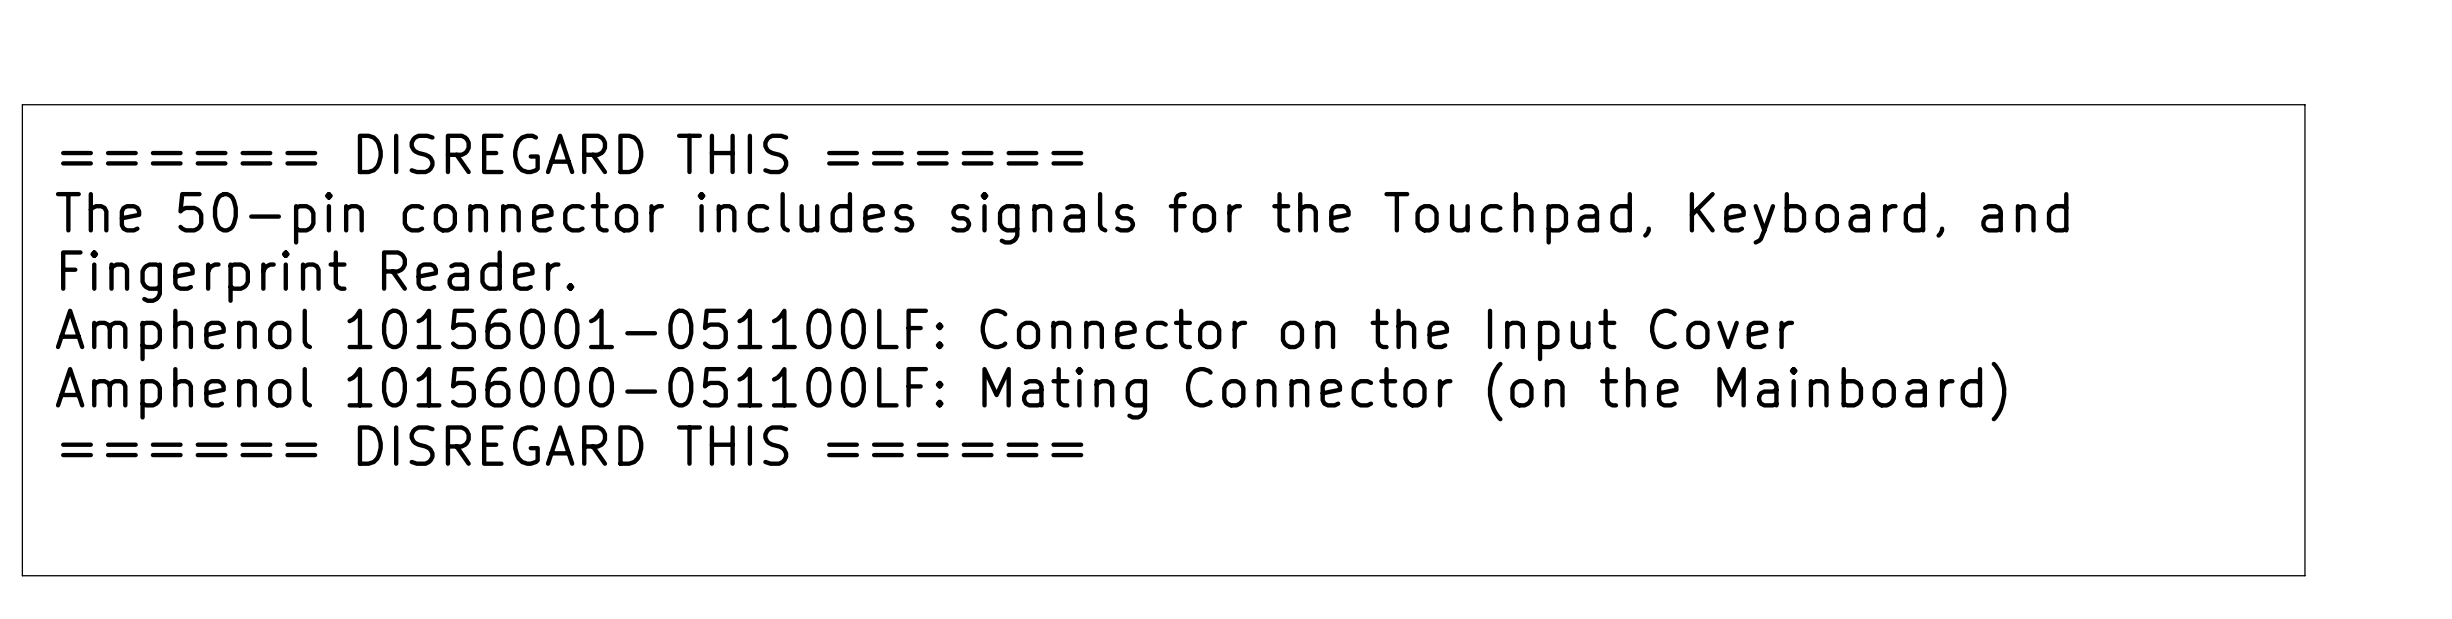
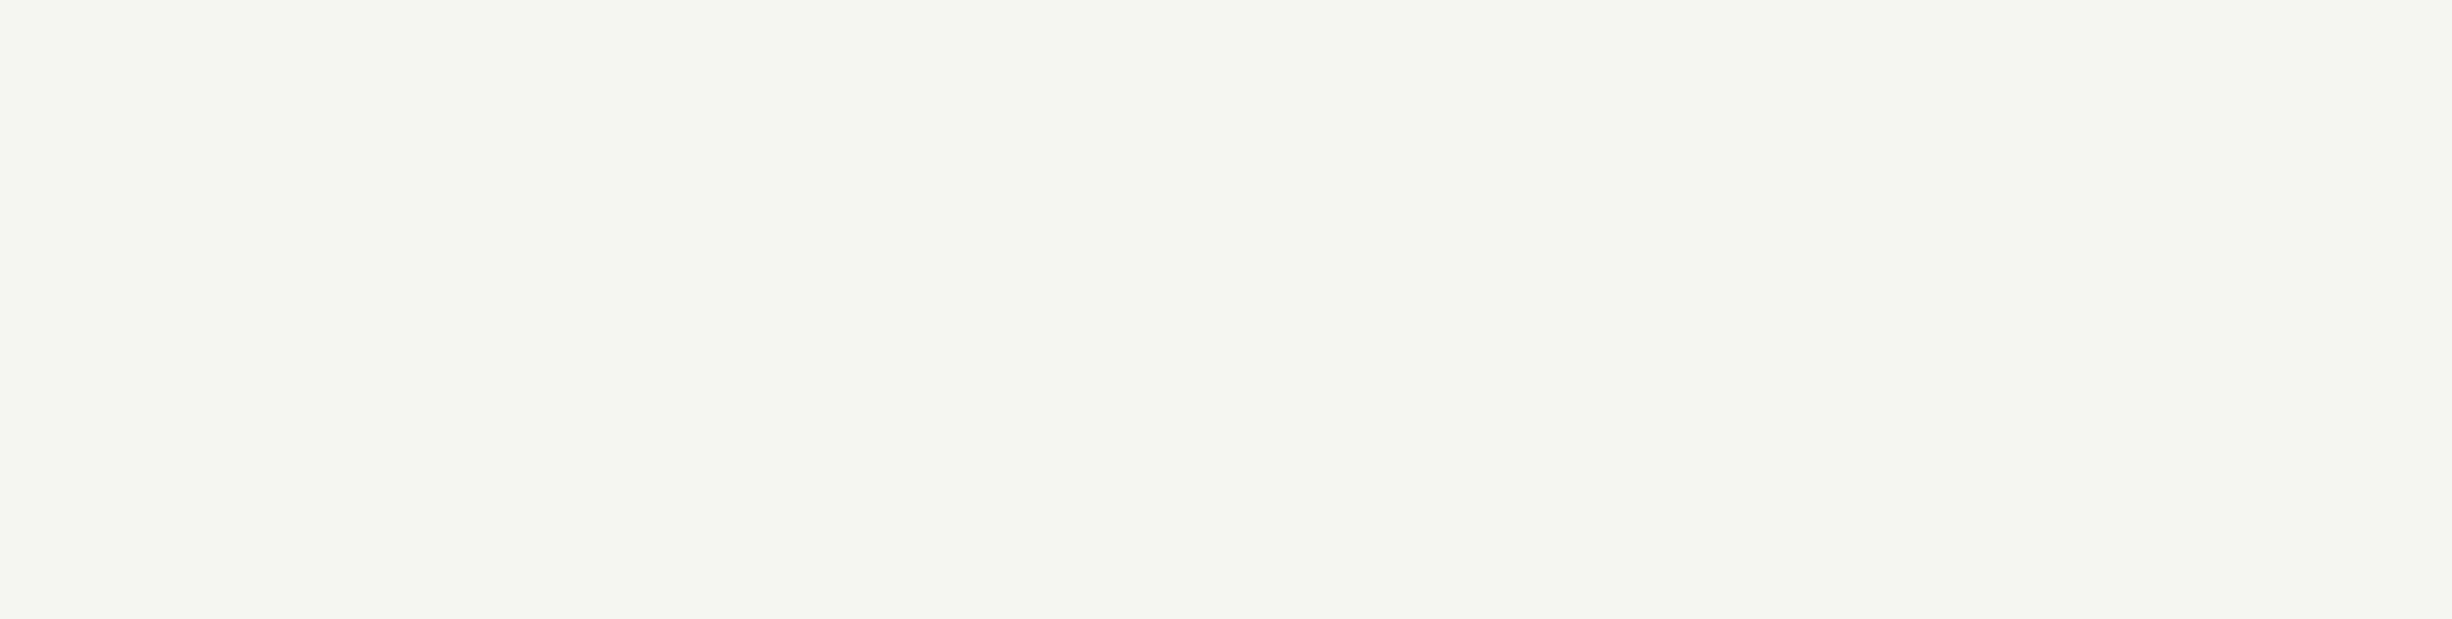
line: (22, 104) (2304, 104) (2304, 575) (22, 575) (22, 104) -> none
text: ====== DISREGARD THIS ====== (572, 153) -> none
text: The 50-pin connector includes signals for the Touchpad, Keyboard, and (1062, 218) -> none
text: Fingerprint Reader. (317, 276) -> none
text: Amphenol 10156001-051100LF: Connector on the Input Cover (924, 334) -> none
text: Amphenol 10156000-051100LF: Mating Connector (on the Mainboard) (1031, 391) -> none
text: ====== DISREGARD THIS ====== (572, 445) -> none

